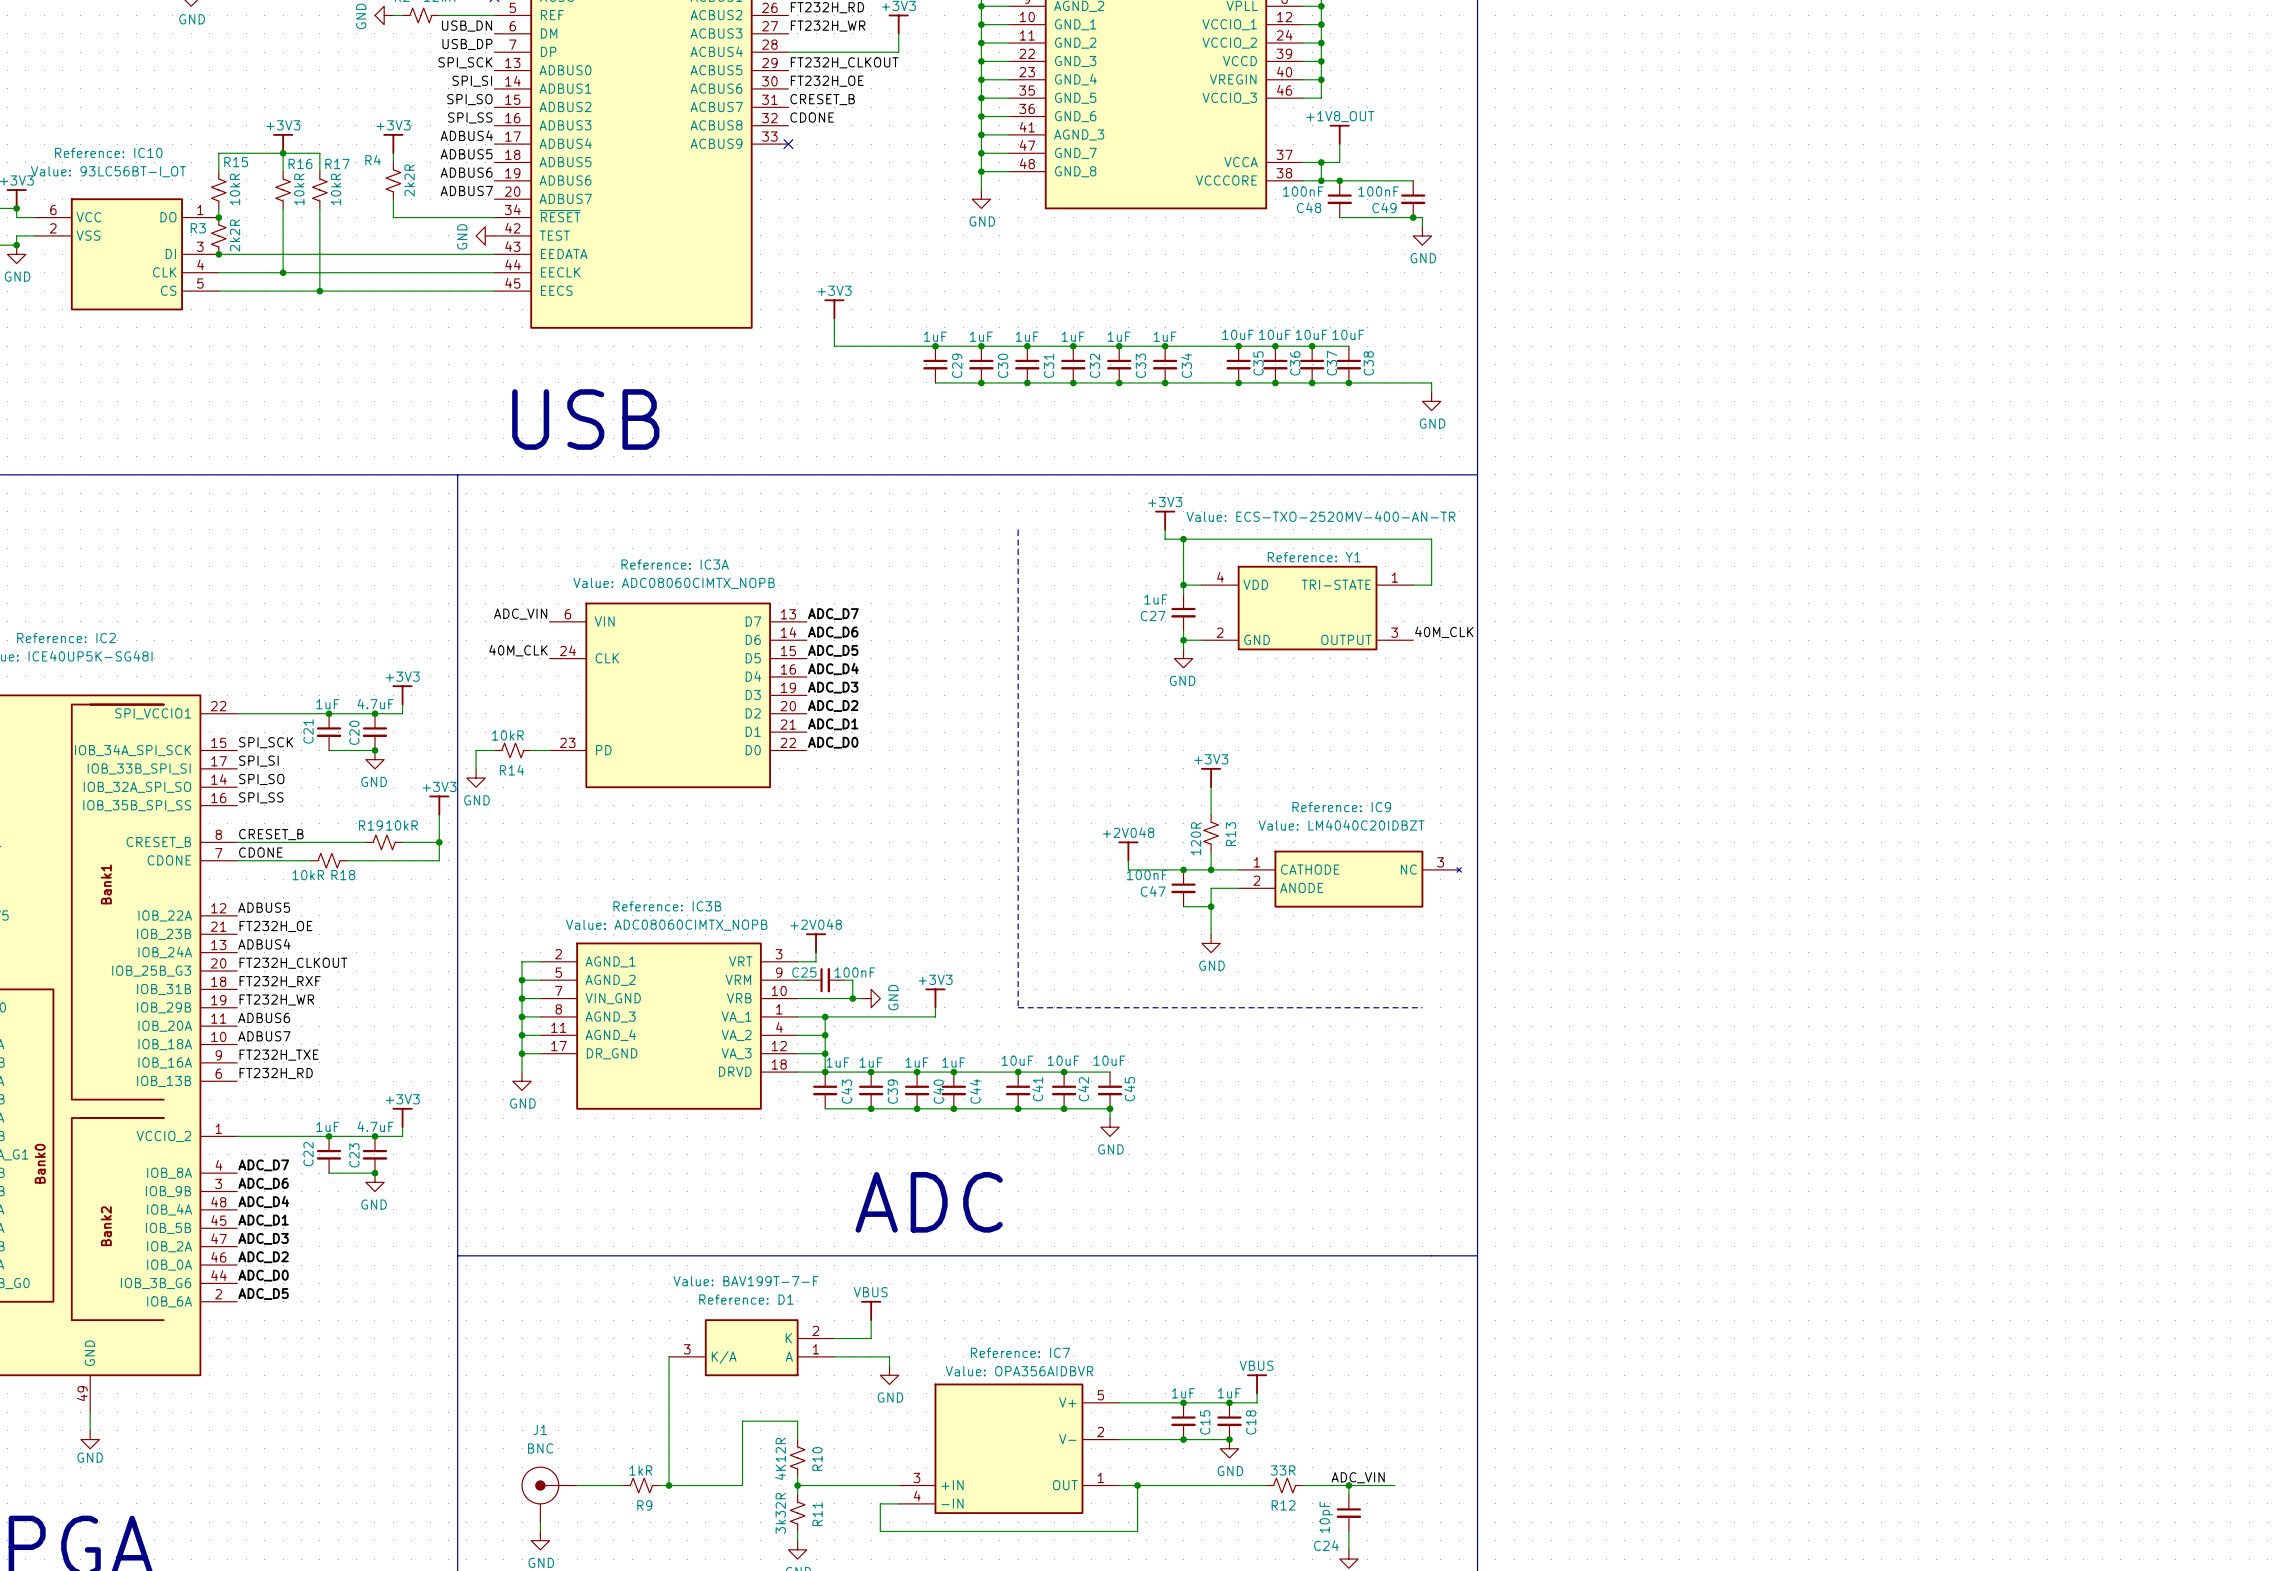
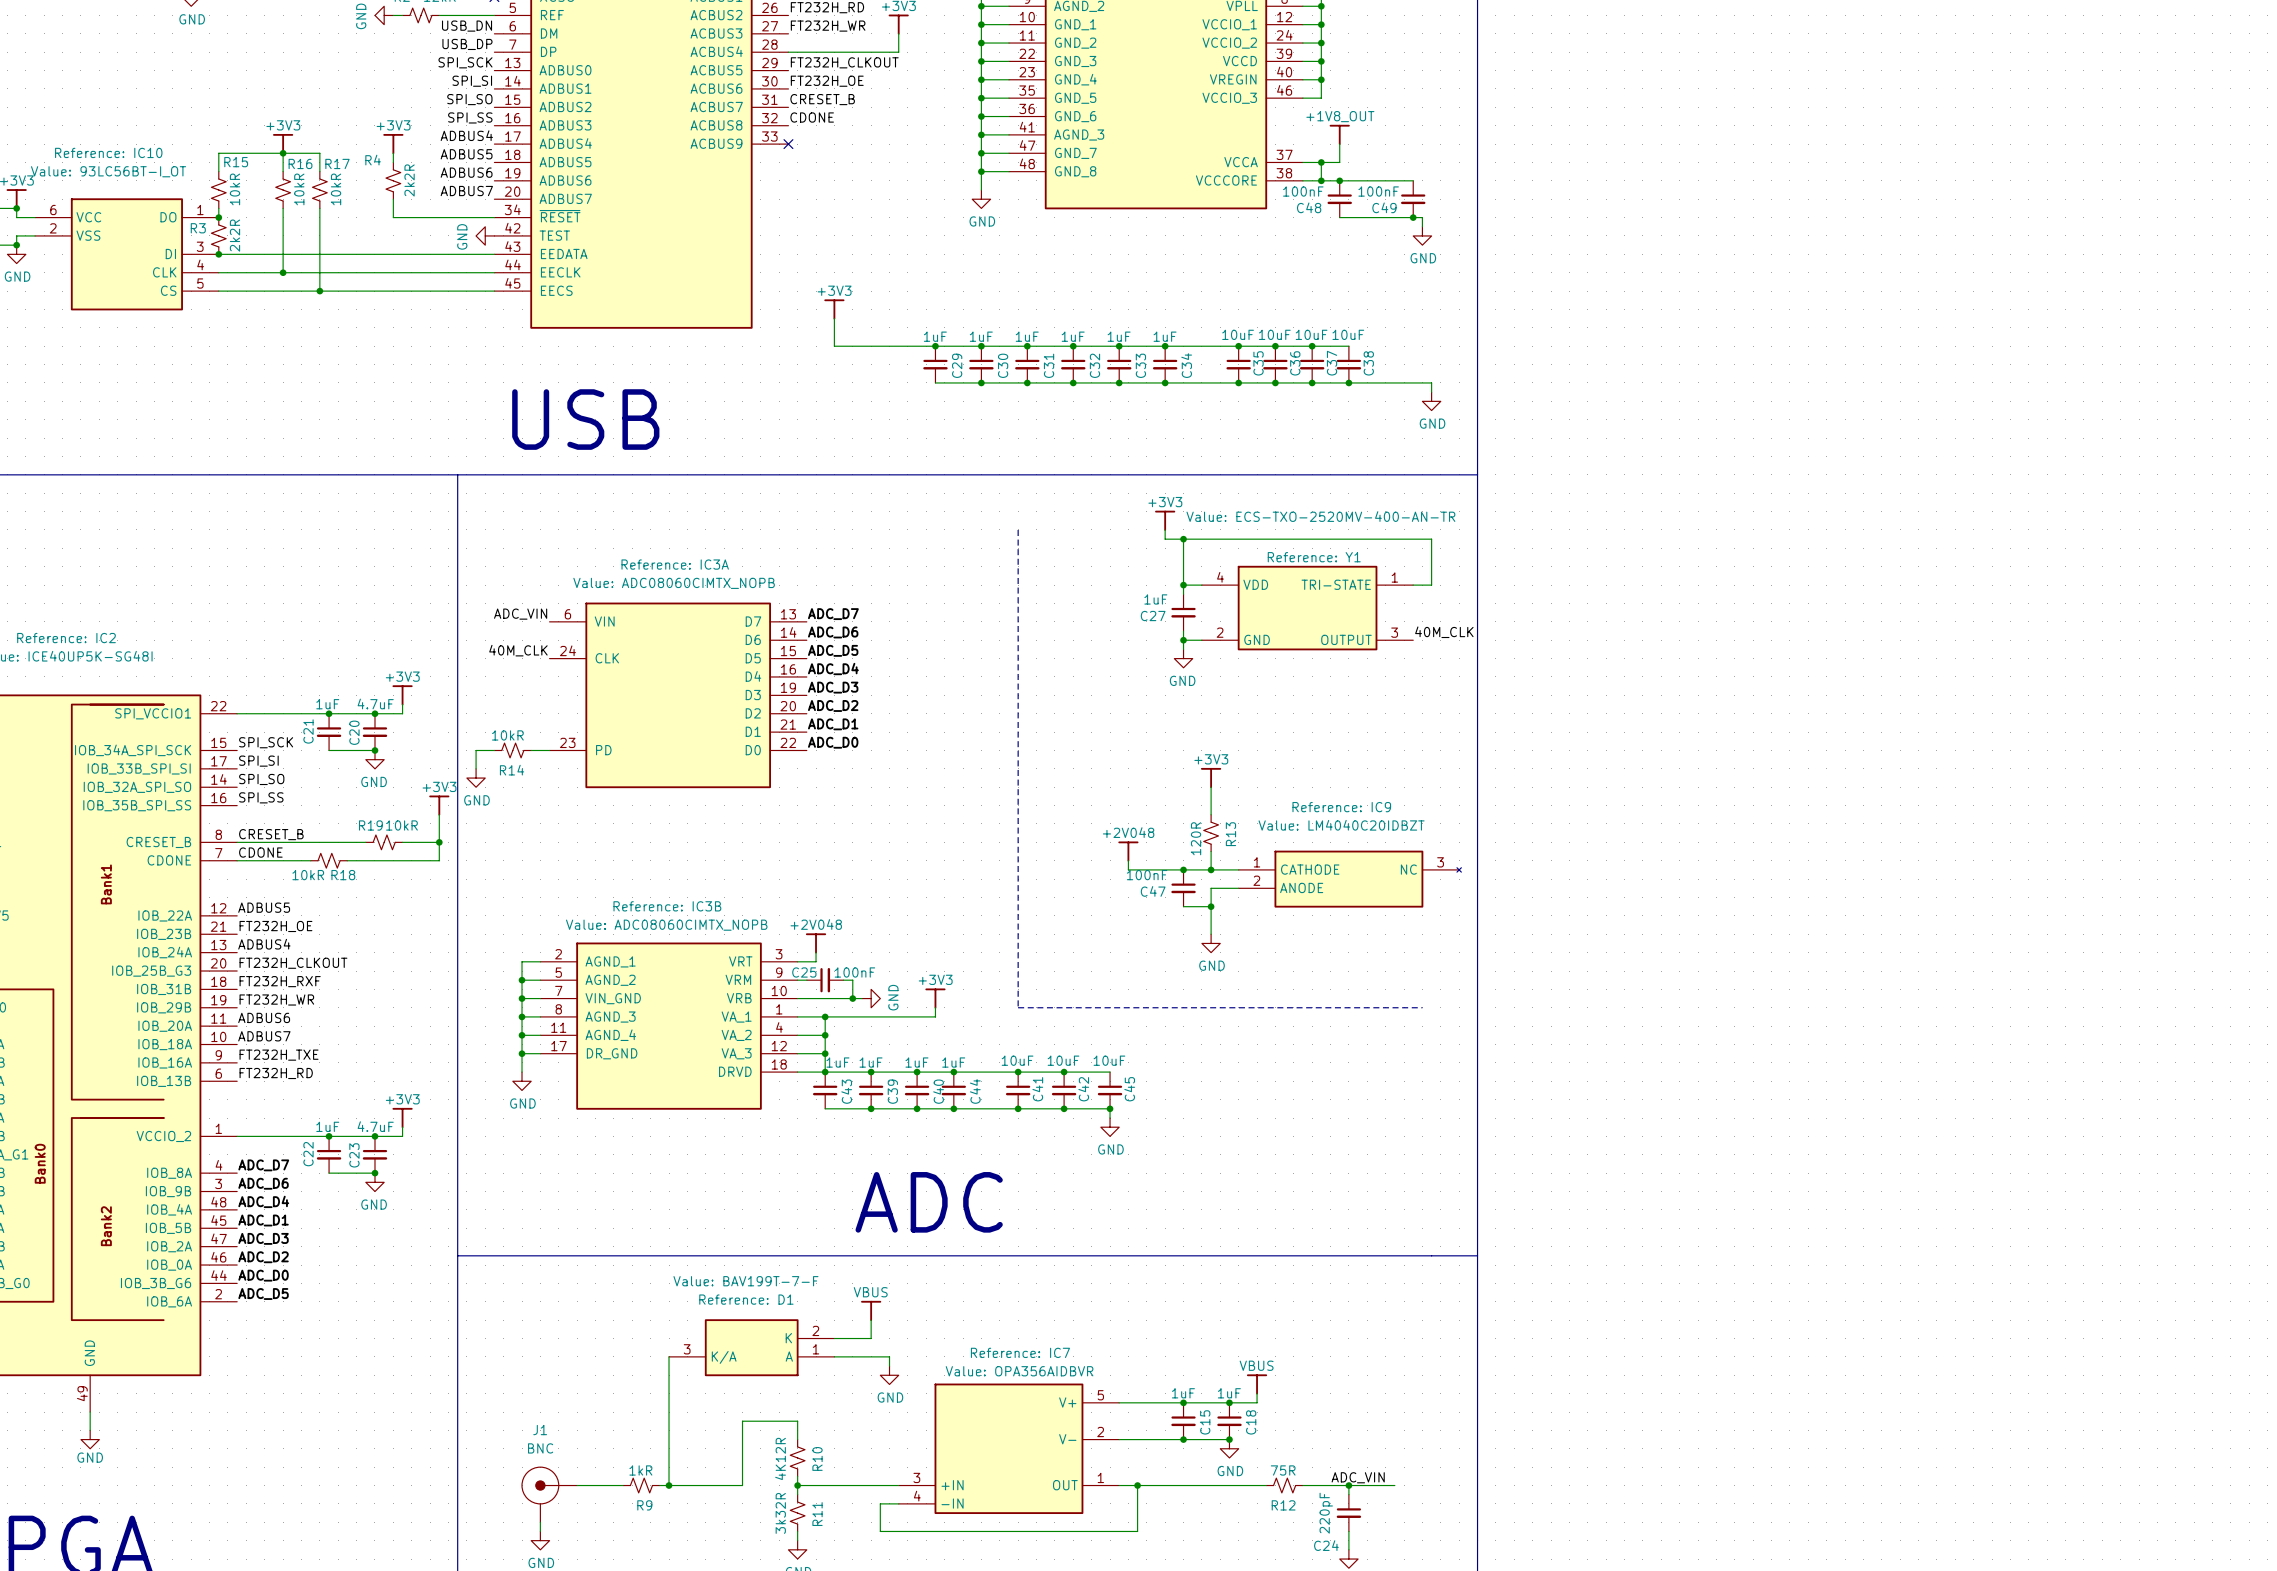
R12 value: 33R (1283, 1470) -> 75R (1283, 1470)
C24 value: 10pF (1326, 1517) -> 220pF (1326, 1513)

